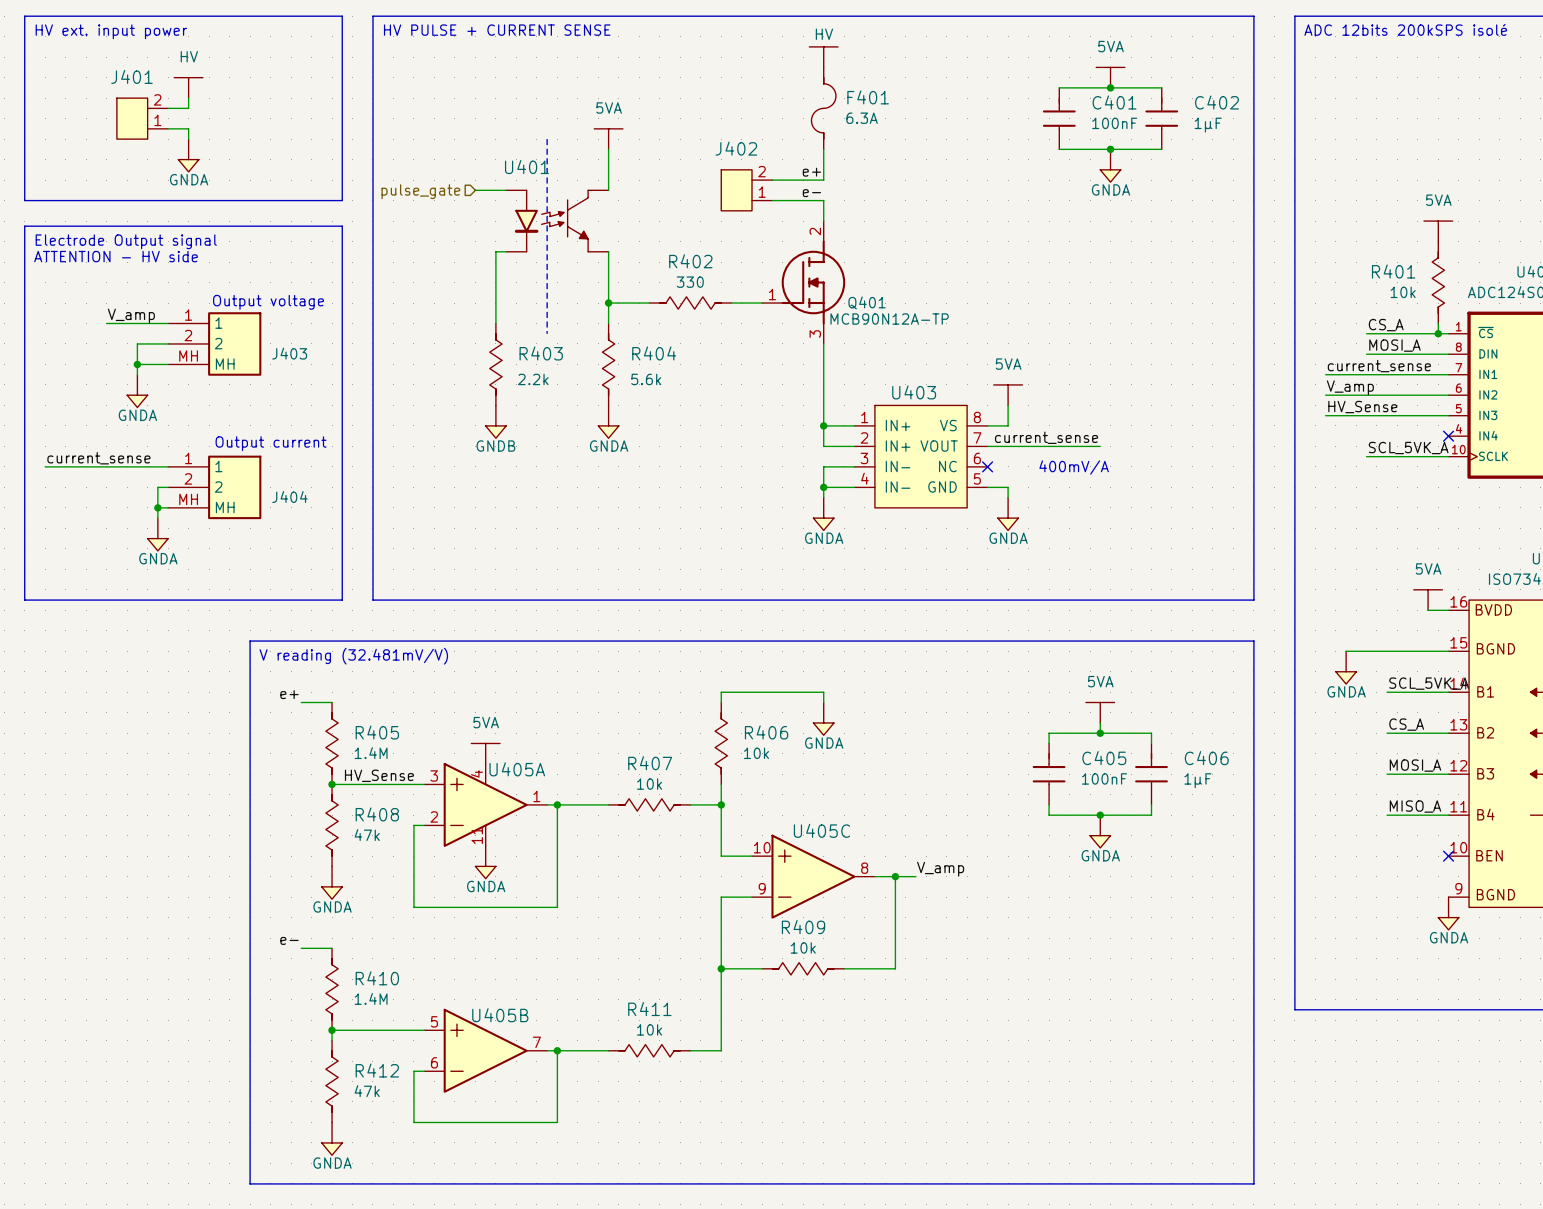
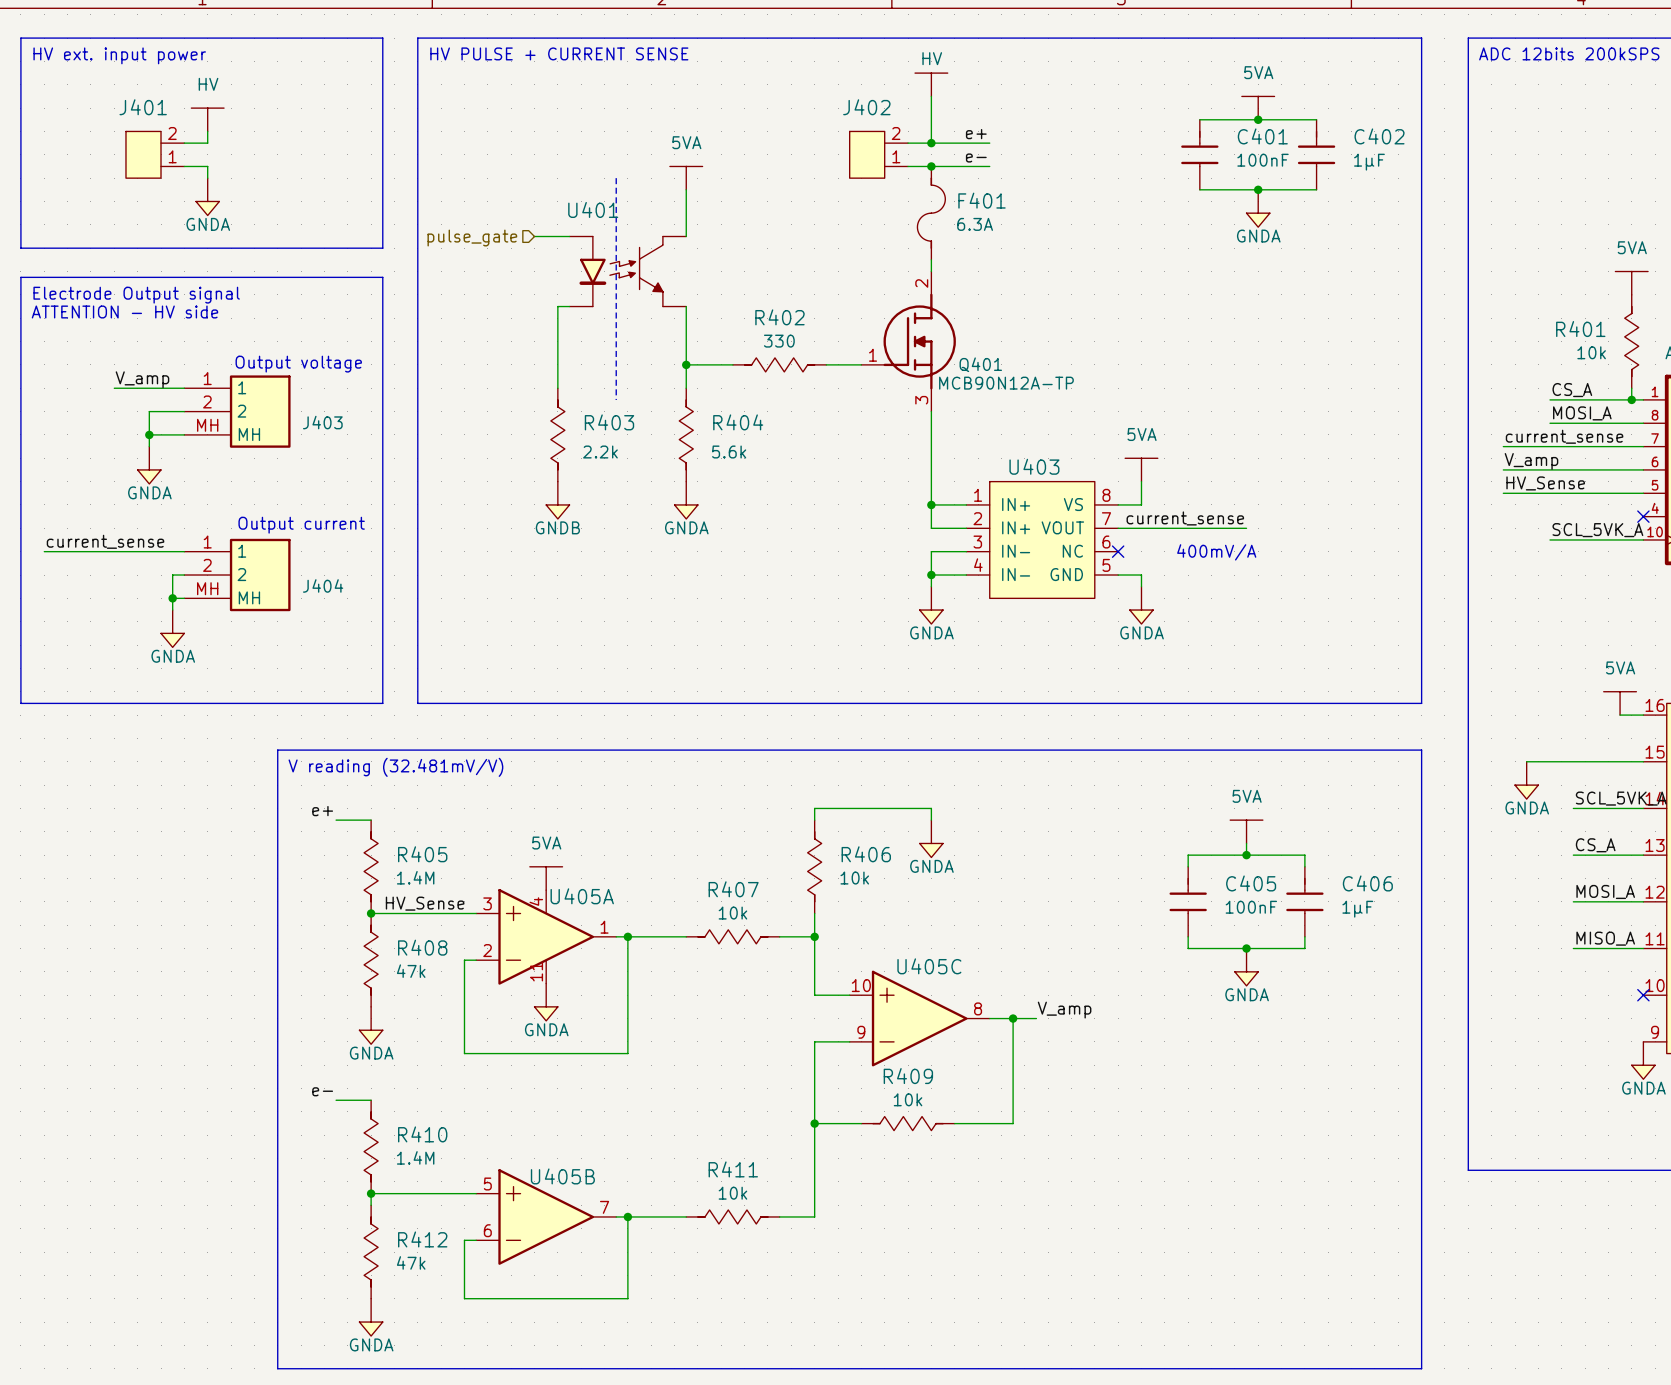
wire: none -> (931, 96) (931, 143)
wire: none -> (908, 143) (989, 143)
F401 position: (823, 108) -> (931, 213)
junction: none -> (931, 143)
wire: none -> (908, 166) (989, 166)
junction: none -> (931, 166)
wire: (823, 149) (823, 180) (772, 180) -> none
label position: e+ (811, 172) -> e+ (976, 134)
J402 position: (746, 190) -> (878, 154)
label position: e- (811, 193) -> e- (976, 158)
wire: (772, 200) (823, 200) (823, 210) -> none

